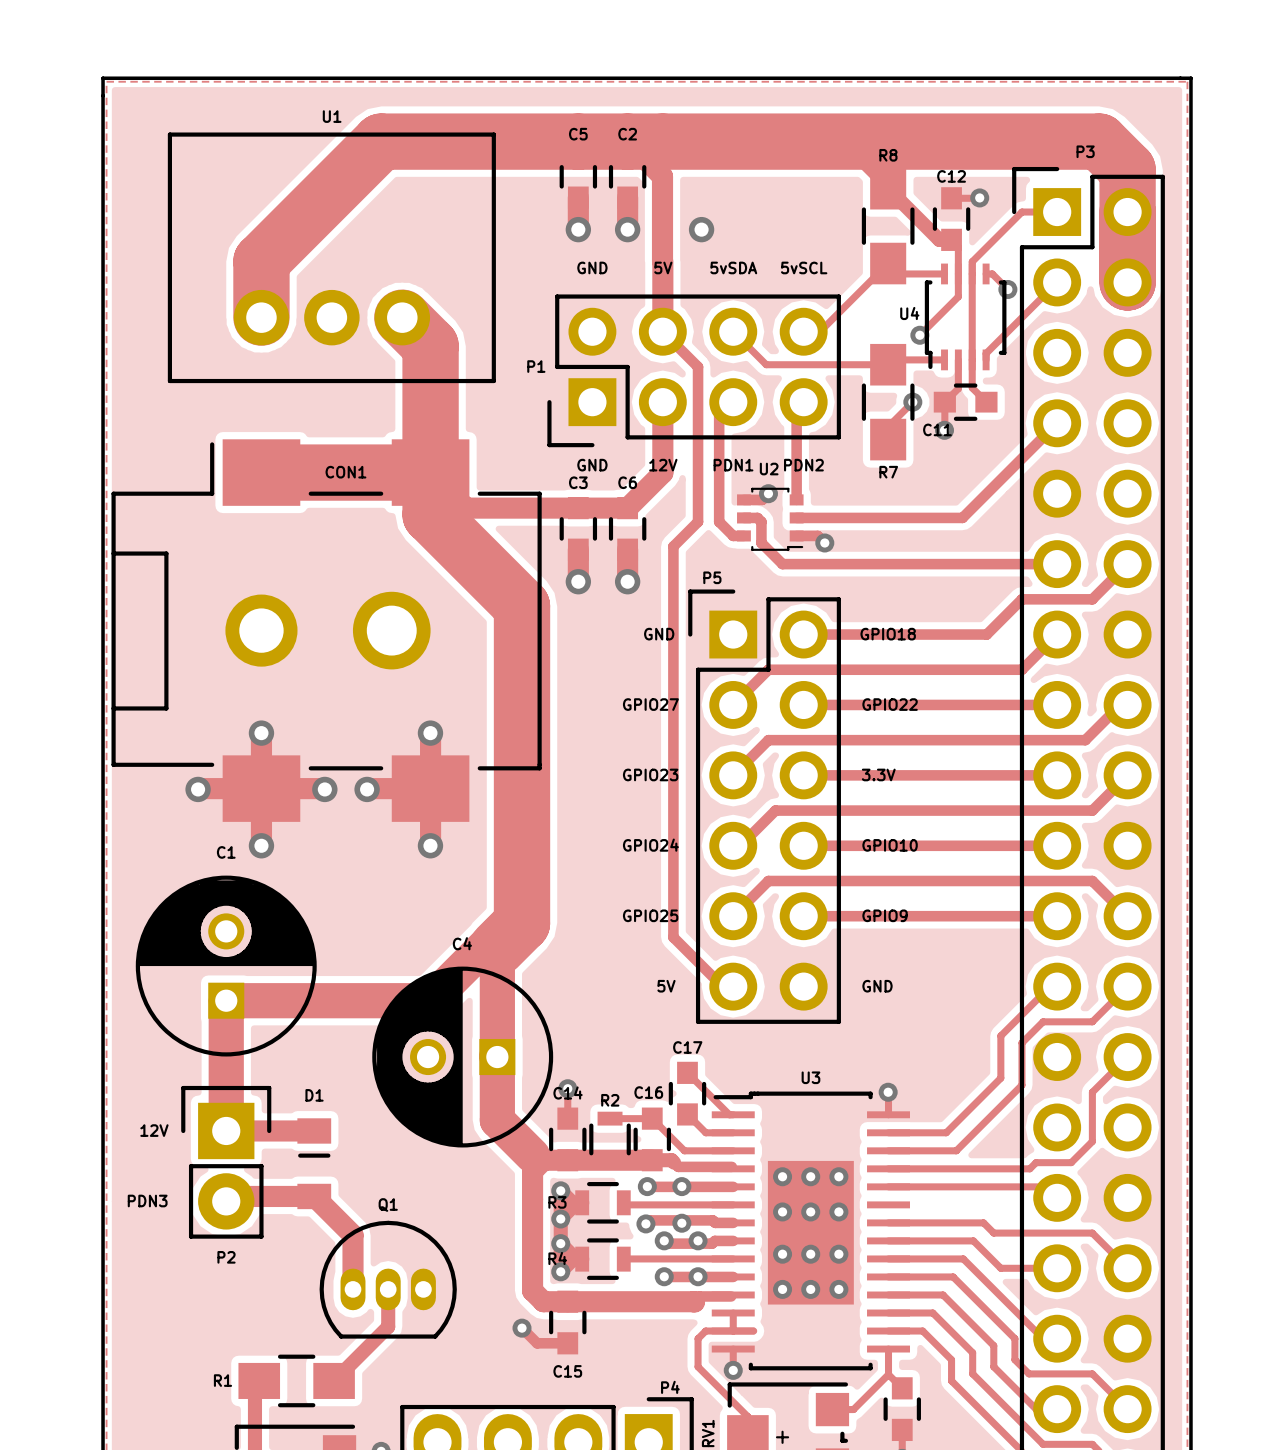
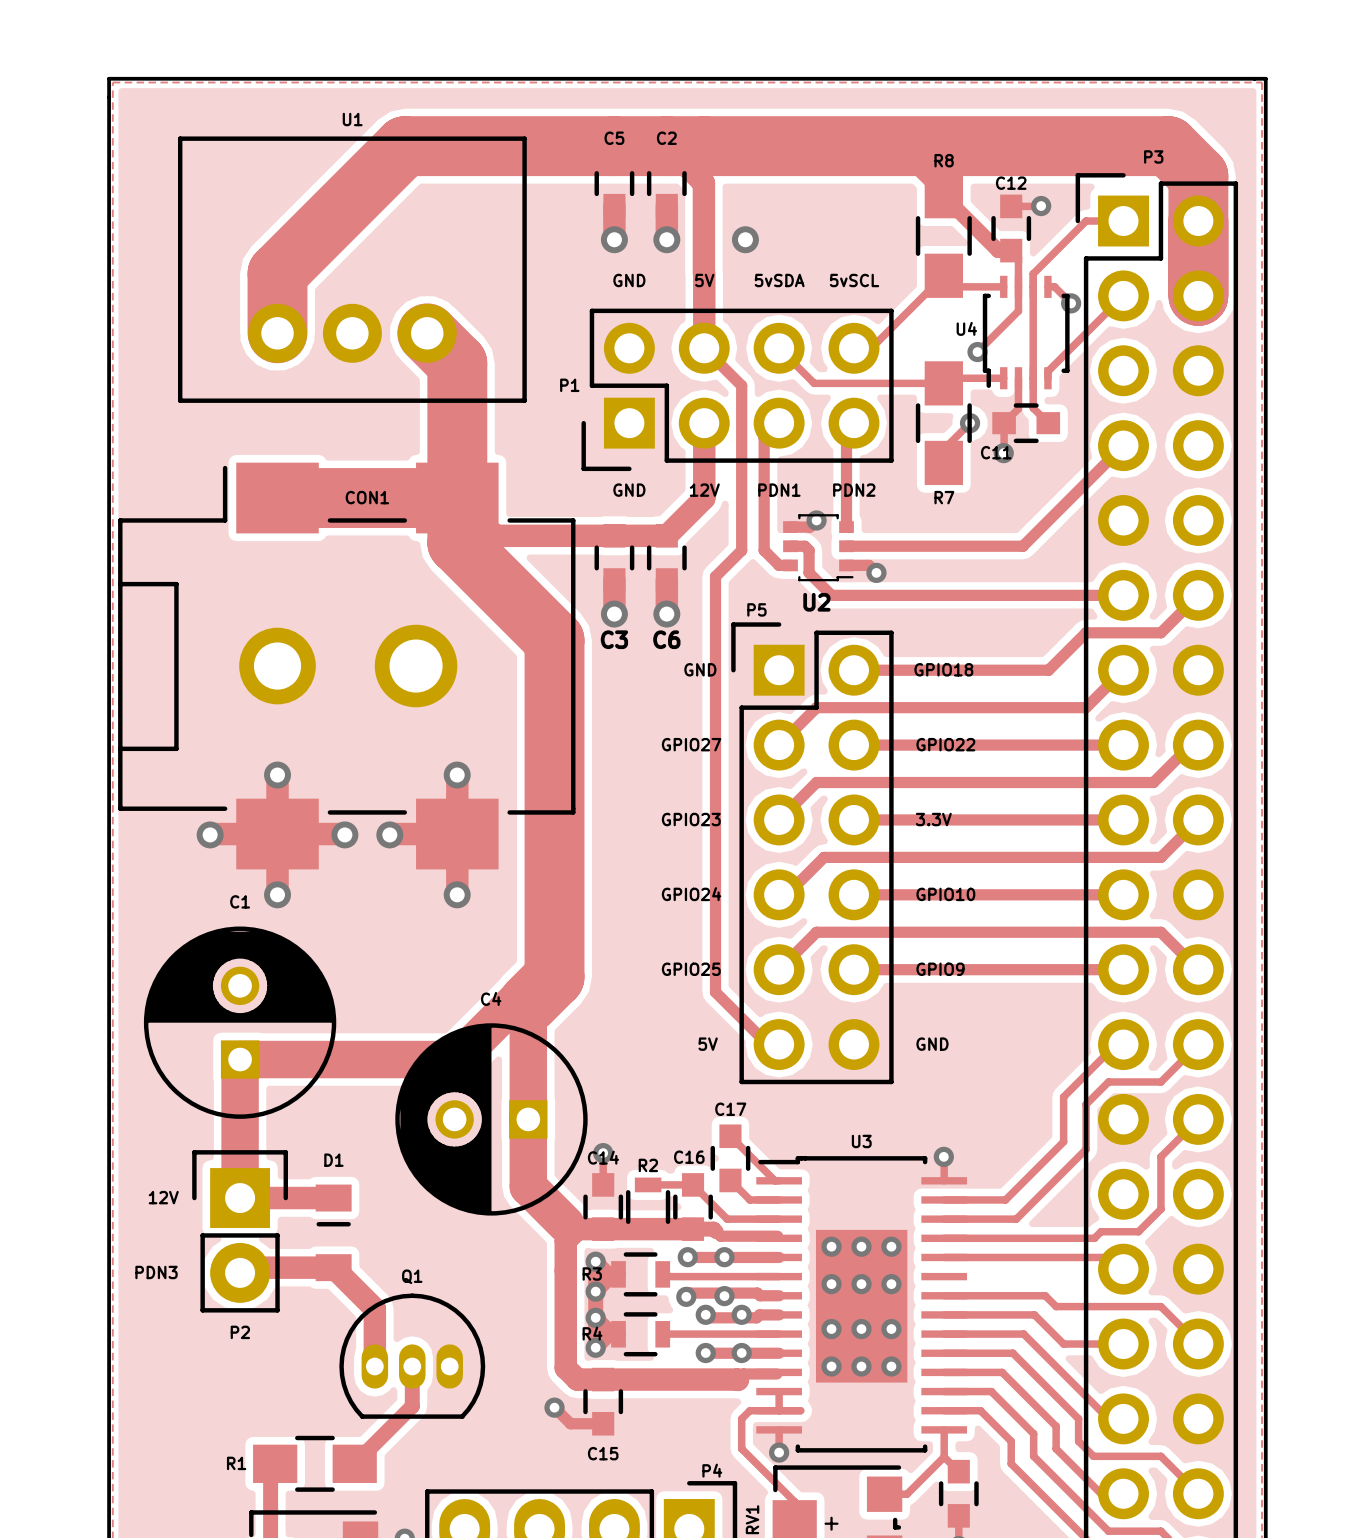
U2 name position: U2 (769, 469) -> U2 (816, 602)
C3 name position: C3 (578, 482) -> C3 (614, 639)
C6 name position: C6 (627, 482) -> C6 (666, 639)

